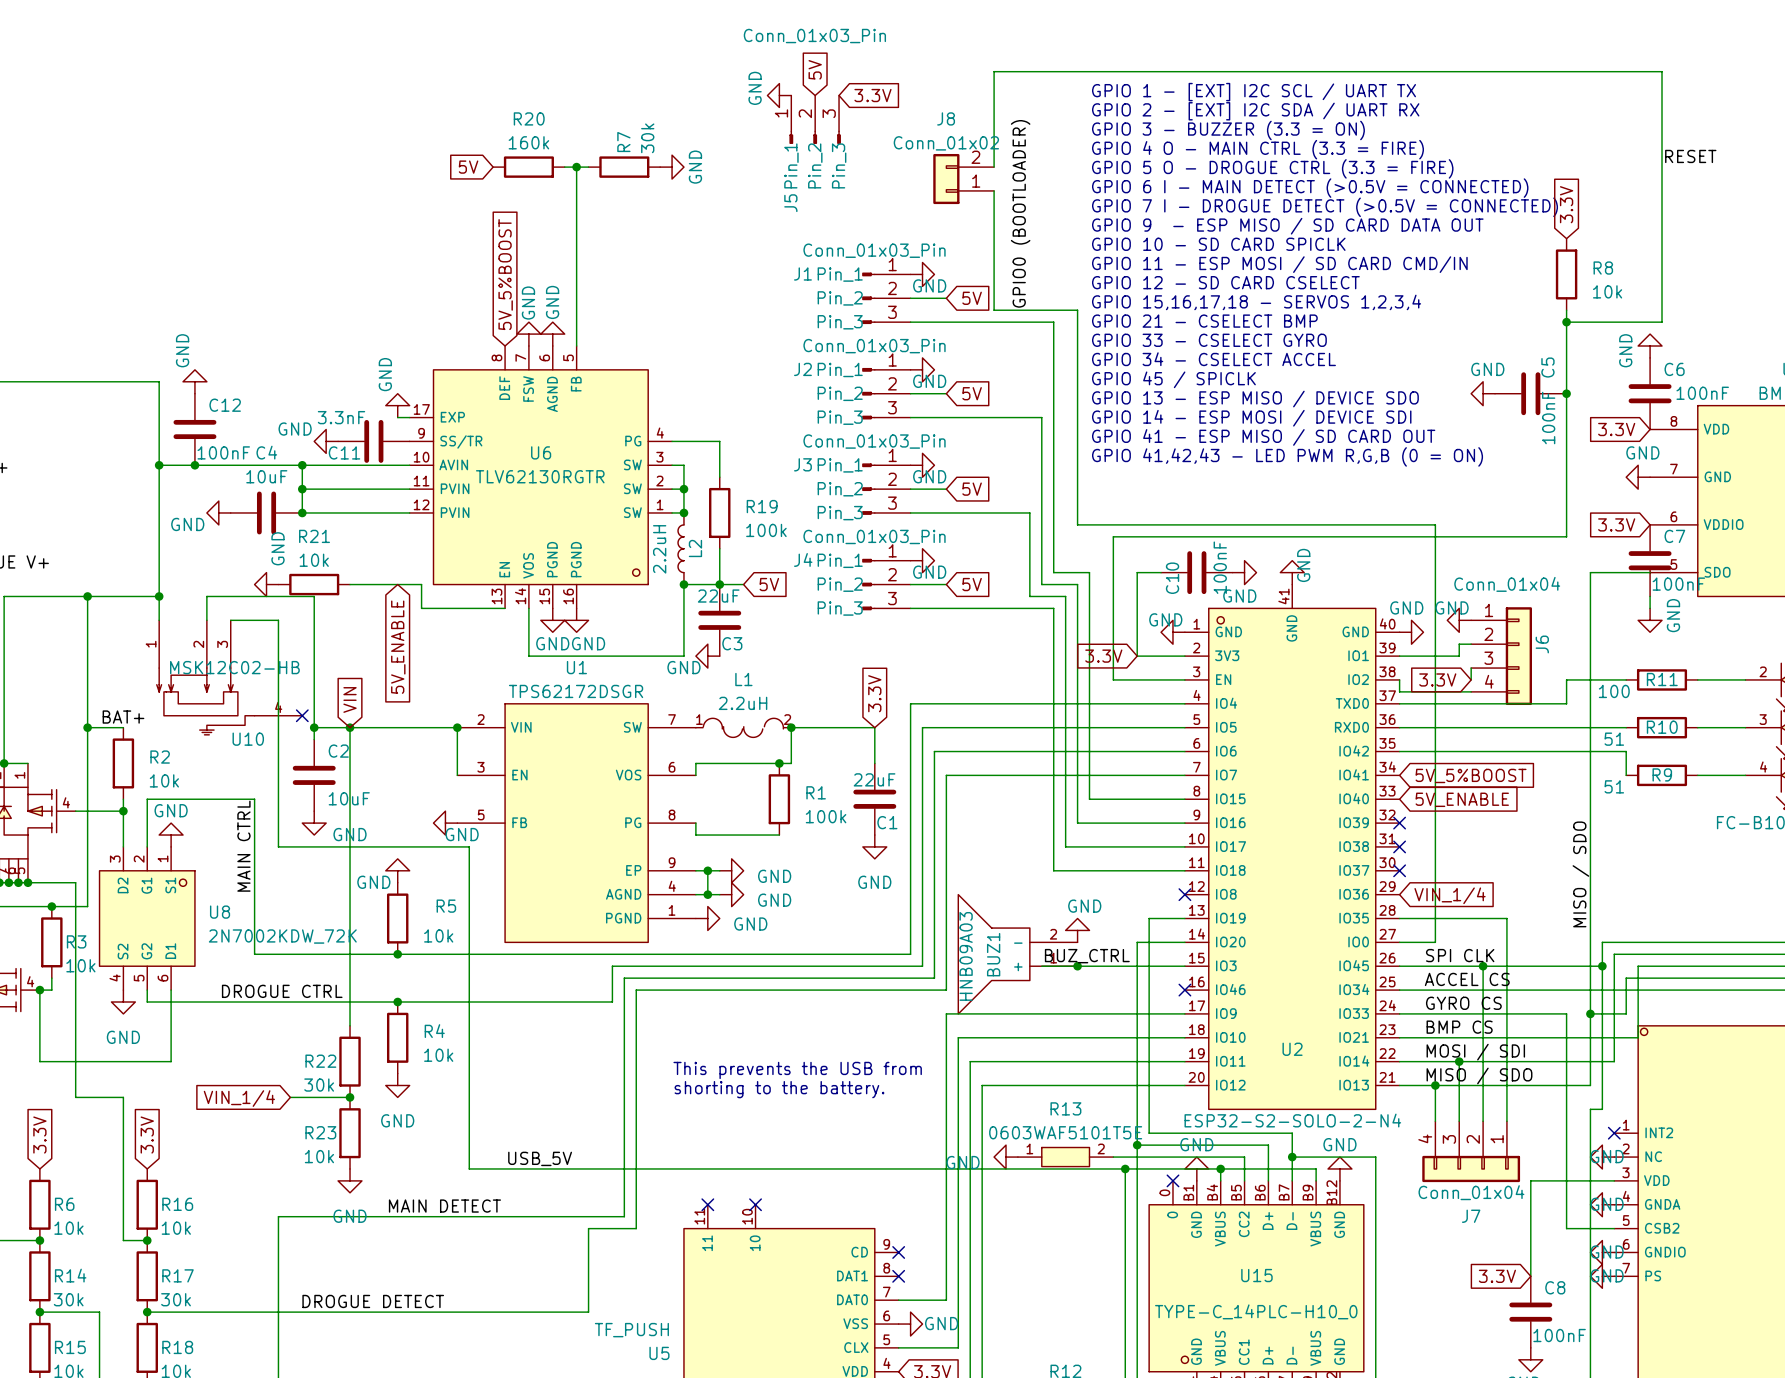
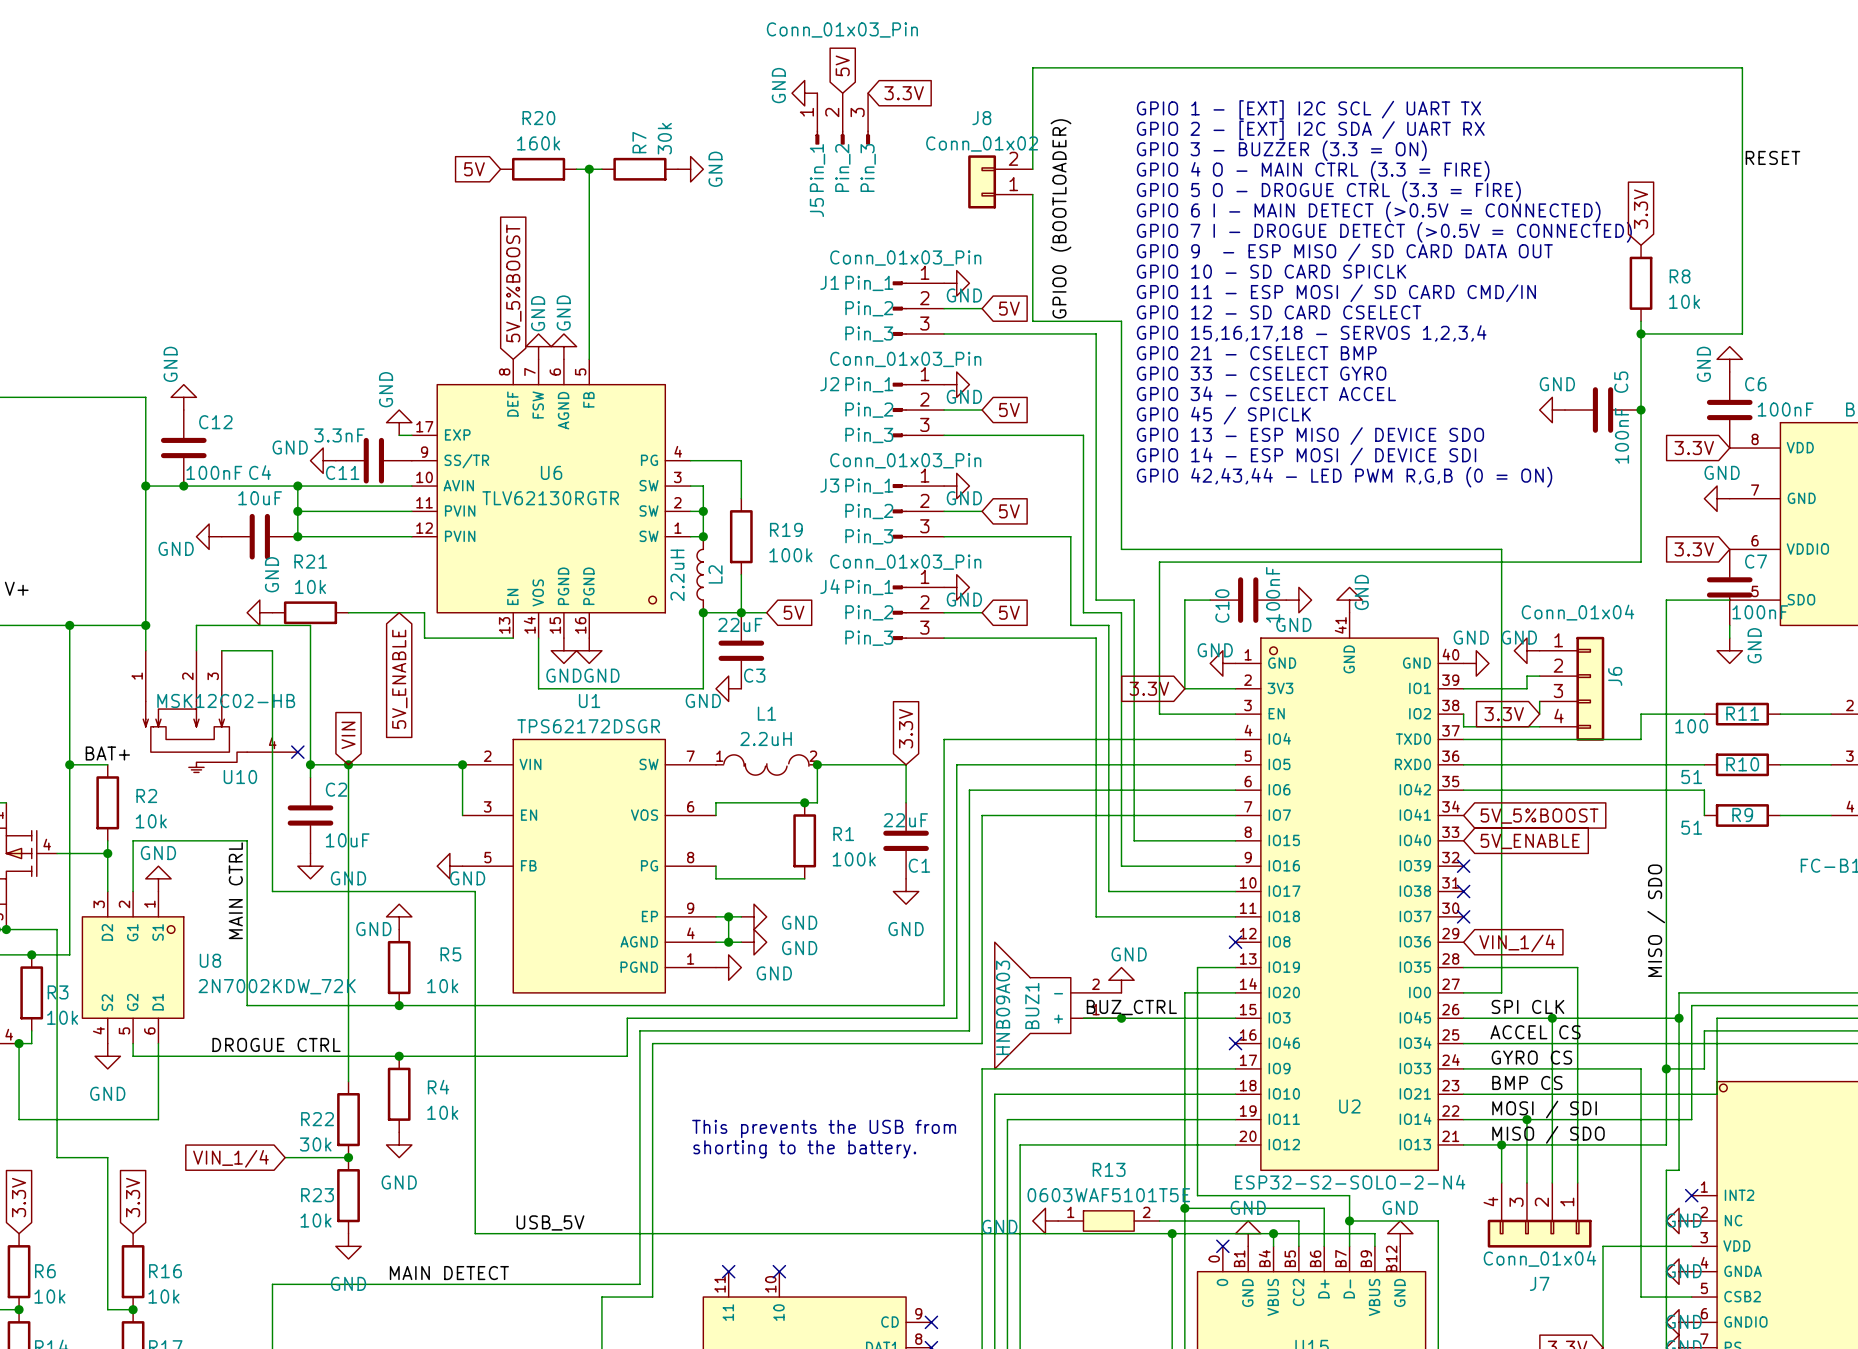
text: GPIO 1 - [EXT] I2C SCL / UART TX (1254, 92) -> none
text: GPIO 2 - [EXT] I2C SDA / UART RX (1255, 111) -> GPIO 1 - [EXT] I2C SCL / UART TX (1308, 109)
text: GPIO 3 - BUZZER (3.3 = ON) (1228, 130) -> GPIO 2 - [EXT] I2C SDA / UART RX (1310, 130)
text: GPIO 4 O - MAIN CTRL (3.3 = FIRE) (1257, 149) -> GPIO 3 - BUZZER (3.3 = ON) (1281, 150)
text: GPIO 5 O - DROGUE CTRL (3.3 = FIRE) (1272, 168) -> GPIO 4 O - MAIN CTRL (3.3 = FIRE) (1313, 171)
text: GPIO 6 I - MAIN DETECT (>0.5V = CONNECTED) (1310, 188) -> GPIO 5 O - DROGUE CTRL (3.3 = FIRE) (1328, 191)
text: GPIO 7 I - DROGUE DETECT (>0.5V = CONNECTED) (1325, 207) -> GPIO 6 I - MAIN DETECT (>0.5V = CONNECTED) (1368, 211)
text: GPIO 9 - ESP MISO / SD CARD DATA OUT (1287, 226) -> GPIO 7 I - DROGUE DETECT (>0.5V = CONNECTED) (1384, 232)
text: GPIO 10 - SD CARD SPICLK (1218, 244) -> GPIO 9 - ESP MISO / SD CARD DATA OUT (1344, 252)
text: GPIO 11 - ESP MOSI / SD CARD CMD/IN (1279, 264) -> GPIO 10 - SD CARD SPICLK (1271, 271)
text: GPIO 12 - SD CARD CSELECT (1225, 282) -> GPIO 11 - ESP MOSI / SD CARD CMD/IN (1336, 293)
text: GPIO 15,16,17,18 - SERVOS 1,2,3,4 (1256, 302) -> GPIO 12 - SD CARD CSELECT (1279, 312)
text: GPIO 21 - CSELECT BMP (1204, 321) -> GPIO 15,16,17,18 - SERVOS 1,2,3,4 (1311, 333)
text: GPIO 33 - CSELECT GYRO (1209, 340) -> GPIO 21 - CSELECT BMP (1256, 353)
text: GPIO 34 - CSELECT ACCEL (1213, 359) -> GPIO 33 - CSELECT GYRO (1261, 373)
text: GPIO 45 / SPICLK (1173, 379) -> GPIO 34 - CSELECT ACCEL (1266, 393)
text: GPIO 13 - ESP MISO / DEVICE SDO (1255, 399) -> GPIO 45 / SPICLK (1223, 415)
text: GPIO 14 - ESP MOSI / DEVICE SDI (1251, 418) -> GPIO 13 - ESP MISO / DEVICE SDO (1310, 436)
text: GPIO 41 - ESP MISO / SD CARD OUT (1263, 437) -> GPIO 14 - ESP MOSI / DEVICE SDI (1306, 456)
text: GPIO 41,42,43 - LED PWM R,G,B (0 = ON) (1287, 456) -> GPIO 42,43,44 - LED PWM R,G,B (0 = ON) (1344, 477)

